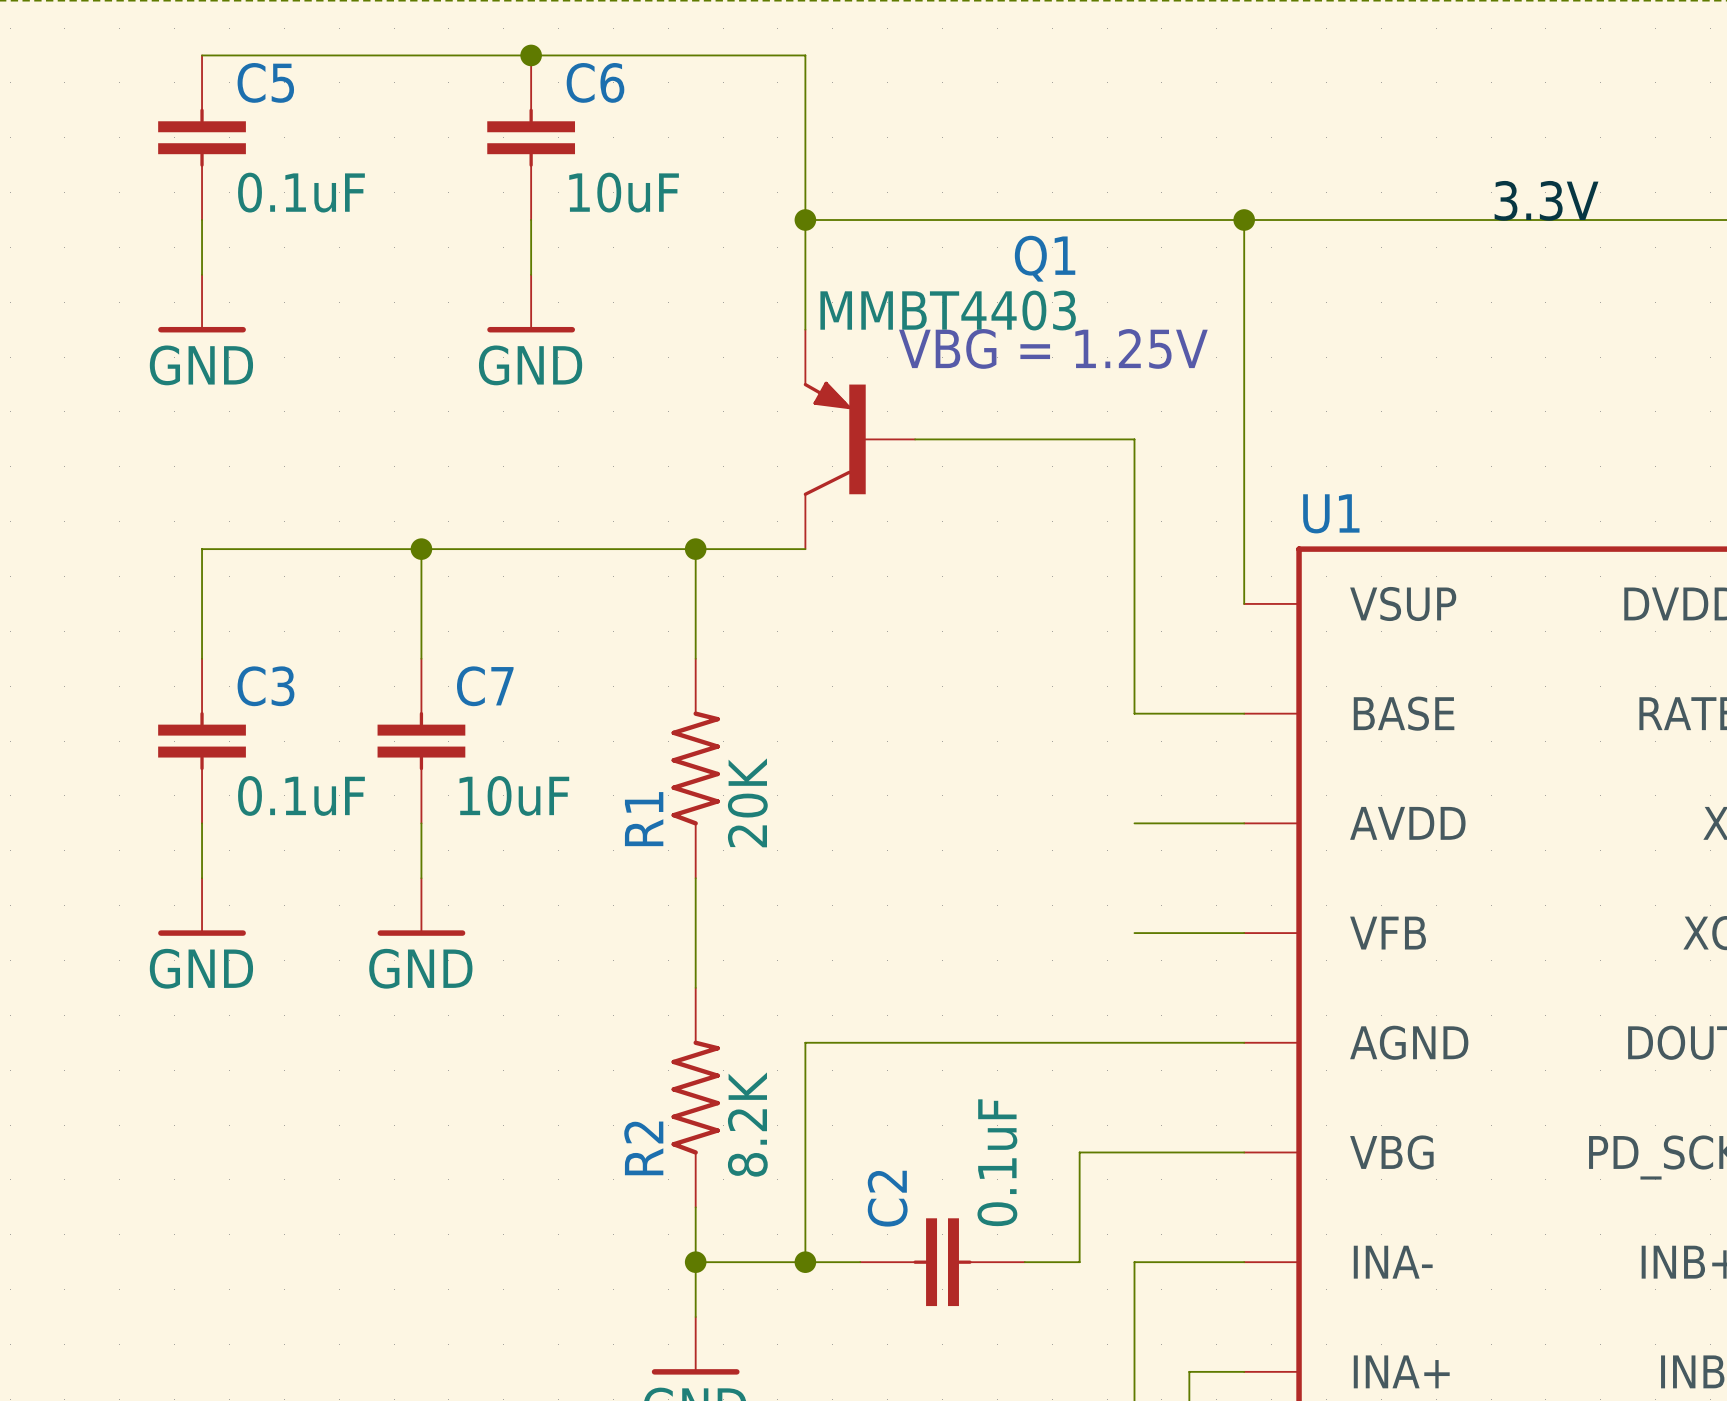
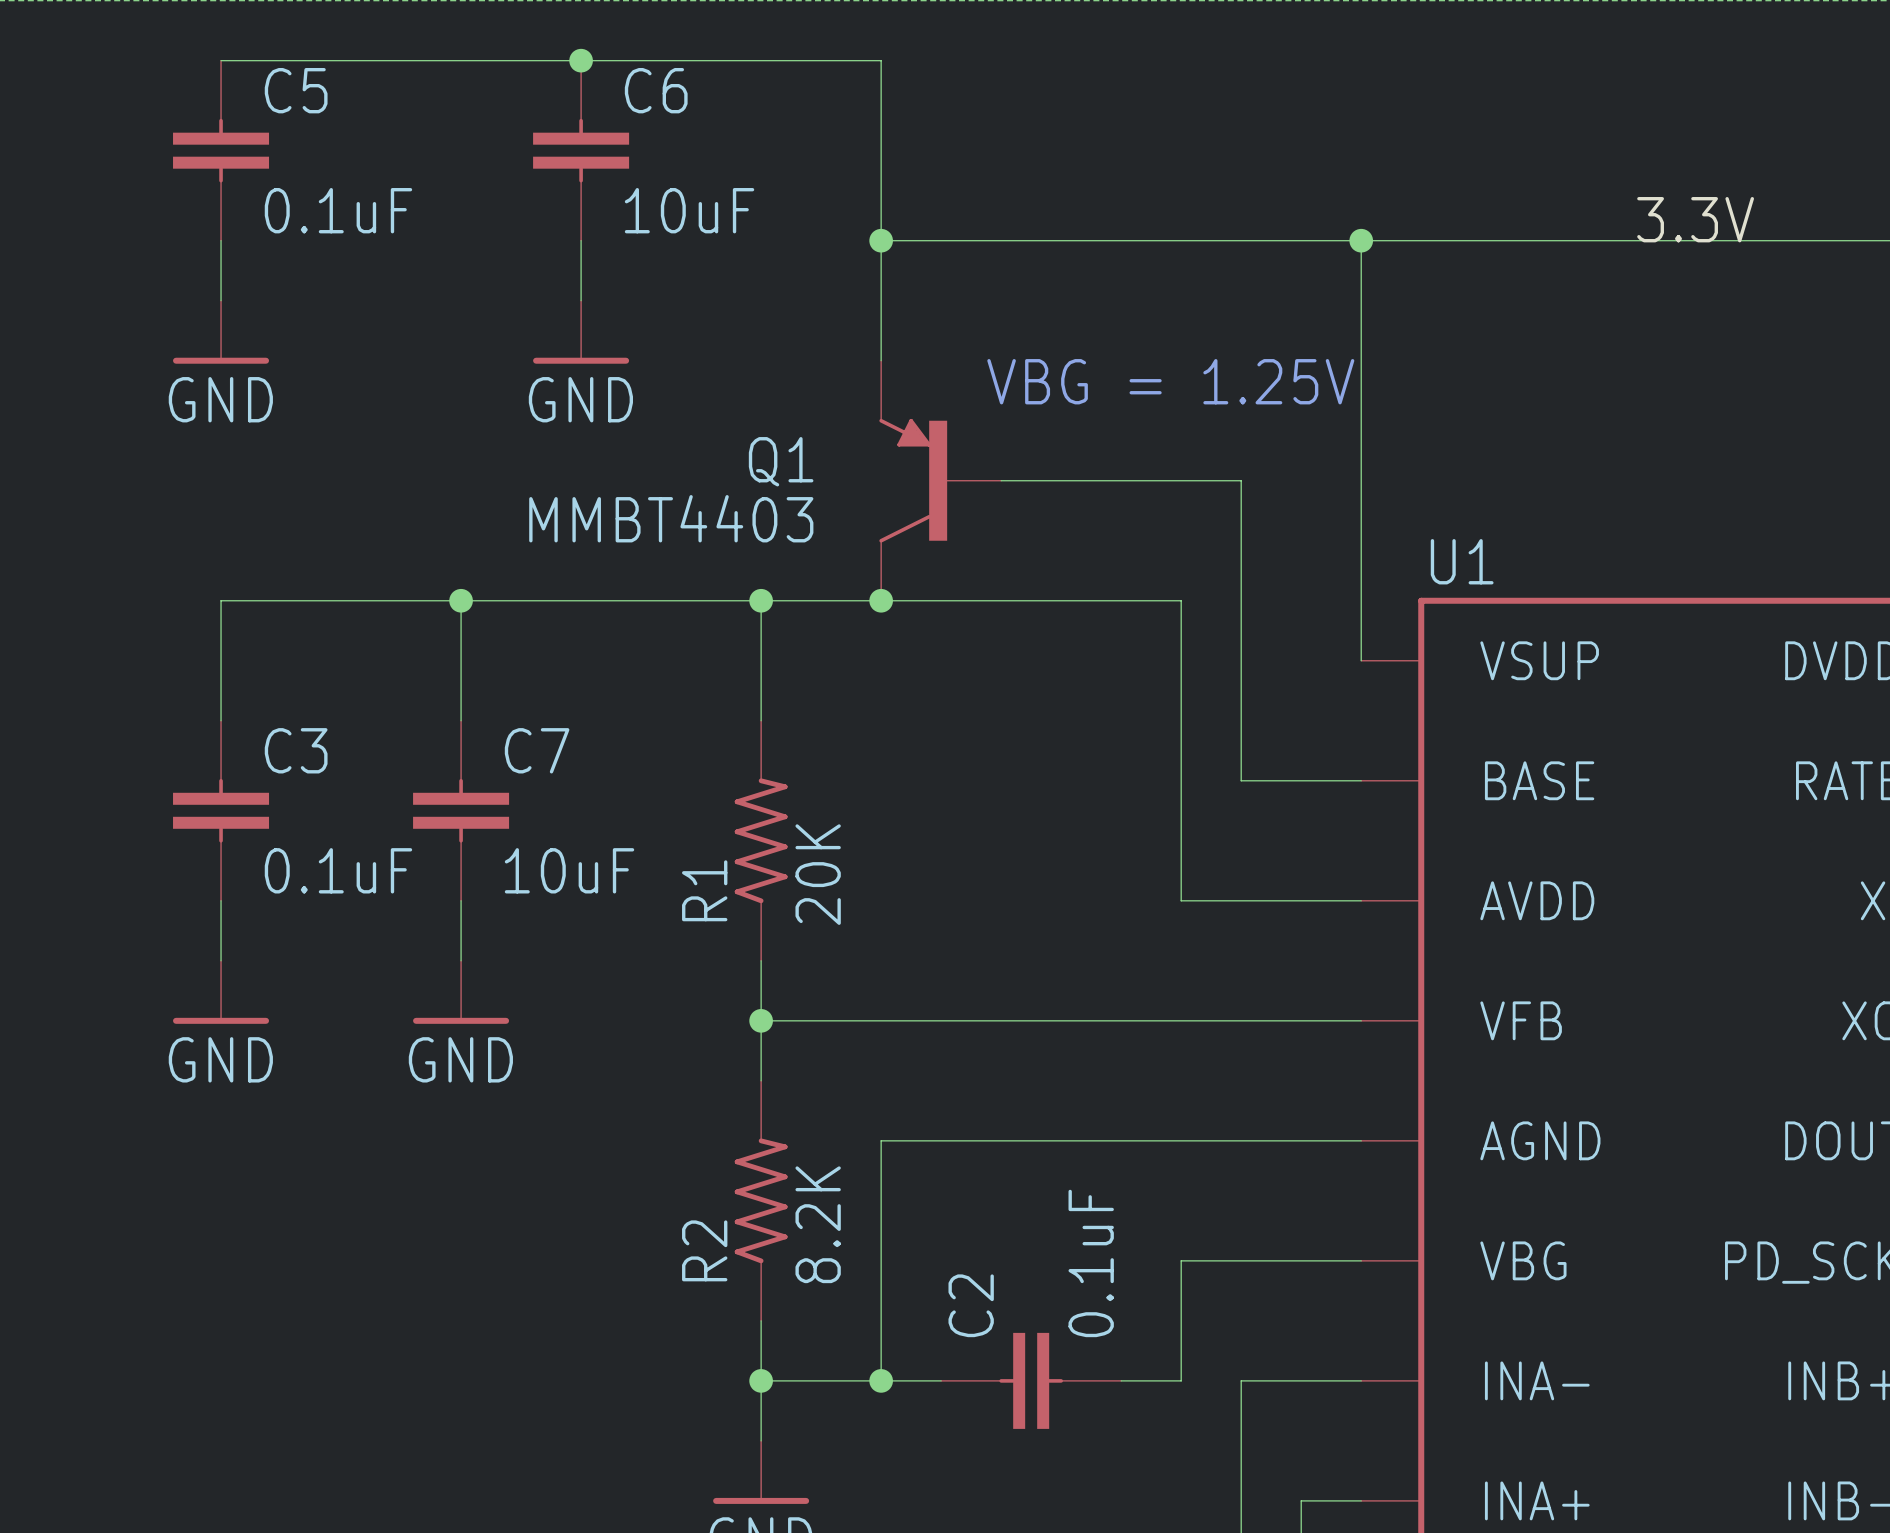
Q1 name position: Q1 (1045, 258) -> Q1 (781, 461)
Q1 value position: MMBT4403 (948, 310) -> MMBT4403 (671, 518)
Q1 symbol: [803, 329, 916, 550] -> [879, 360, 1002, 601]
wire: none -> (881, 600) (1181, 600) (1181, 900) (1241, 900)
junction: none -> (881, 600)
wire: none -> (761, 1020) (1241, 1020)
junction: none -> (761, 1020)

